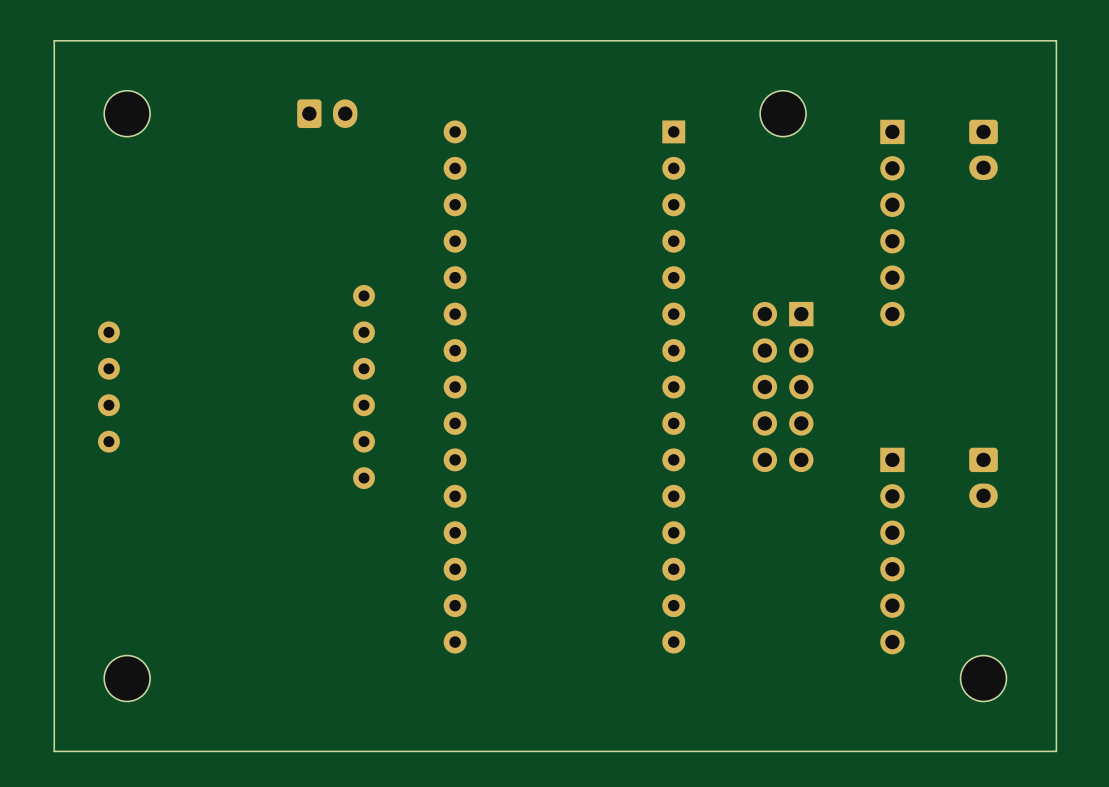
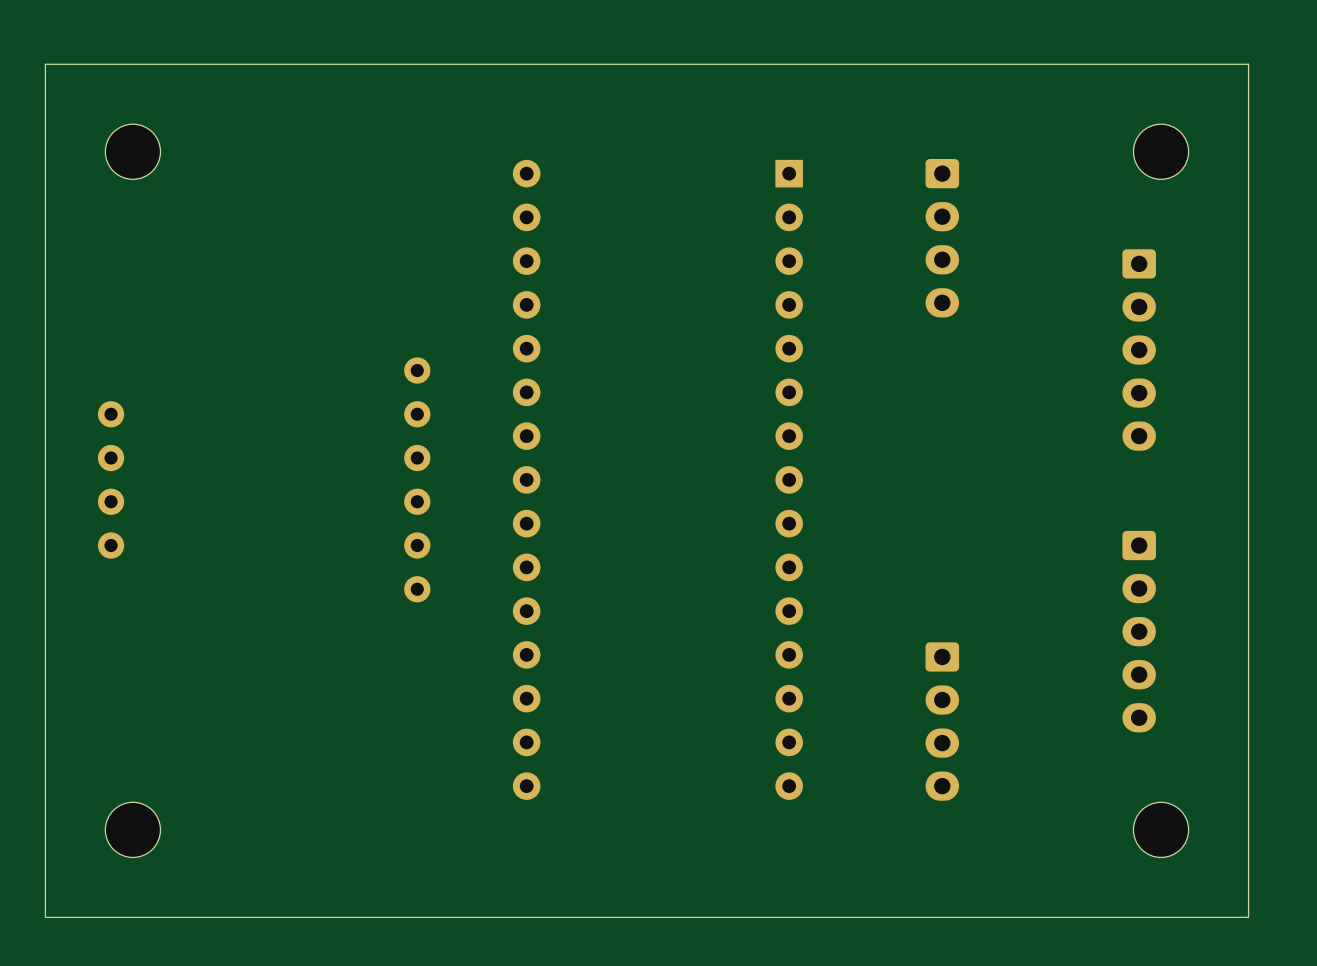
part: (327, 113) -> none
part position: (783, 113) -> (1161, 151)
part: (983, 149) -> none
part: none -> (942, 238)
part: (892, 223) -> none
part: none -> (1139, 350)
part: (783, 387) -> none
part: (983, 477) -> none
part: none -> (1139, 631)
part: (892, 550) -> none
part: none -> (942, 721)

